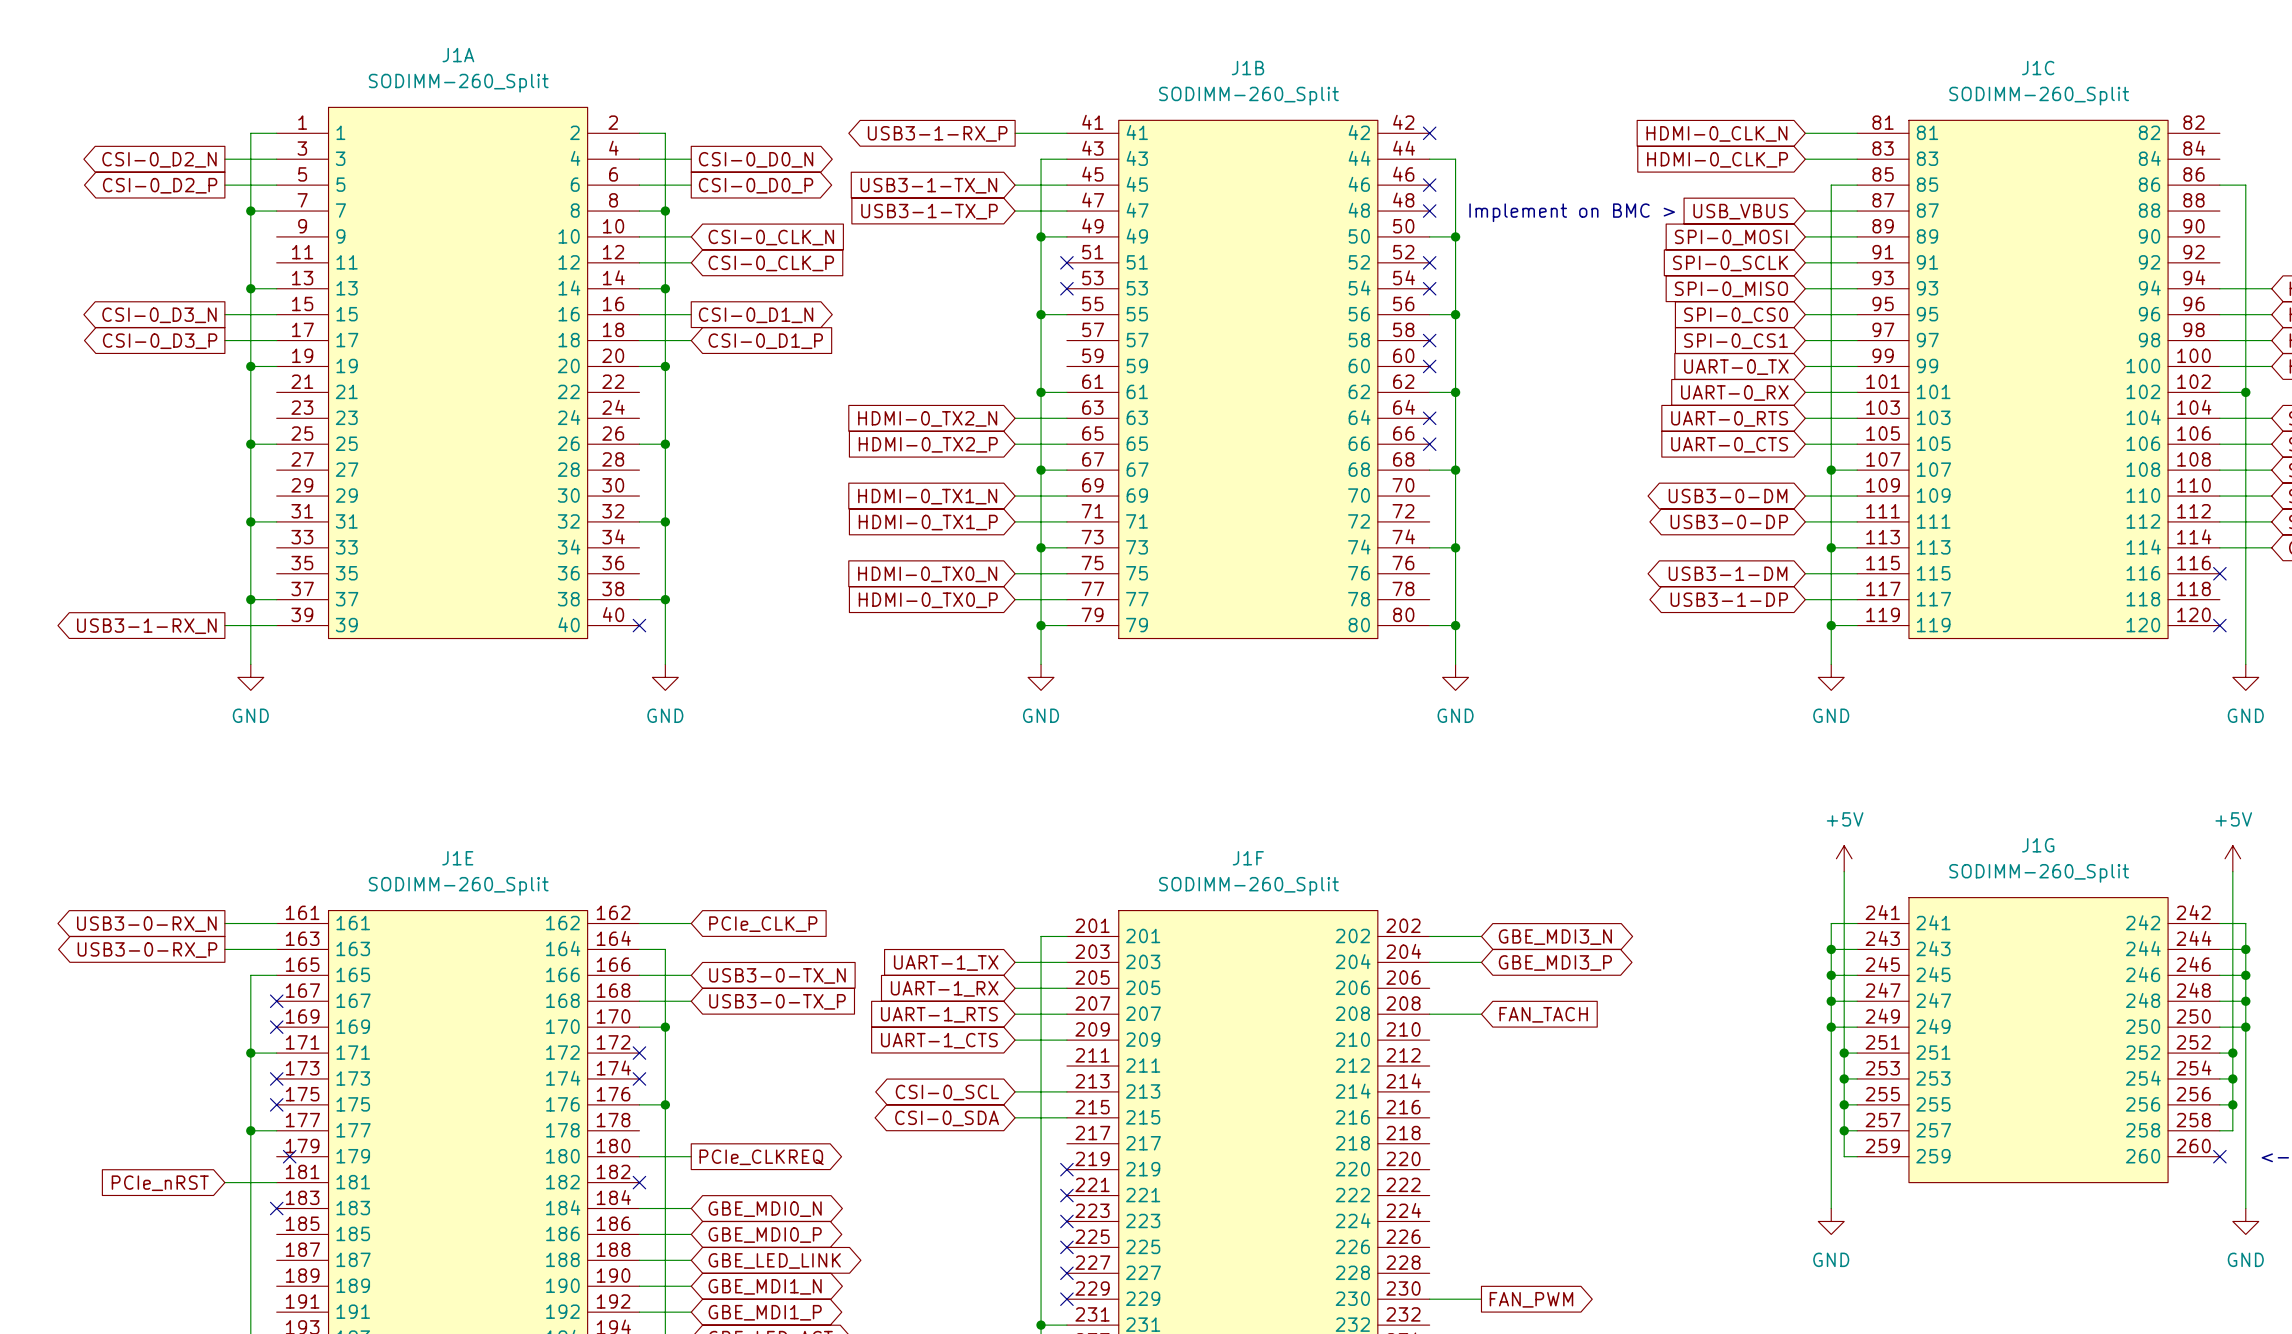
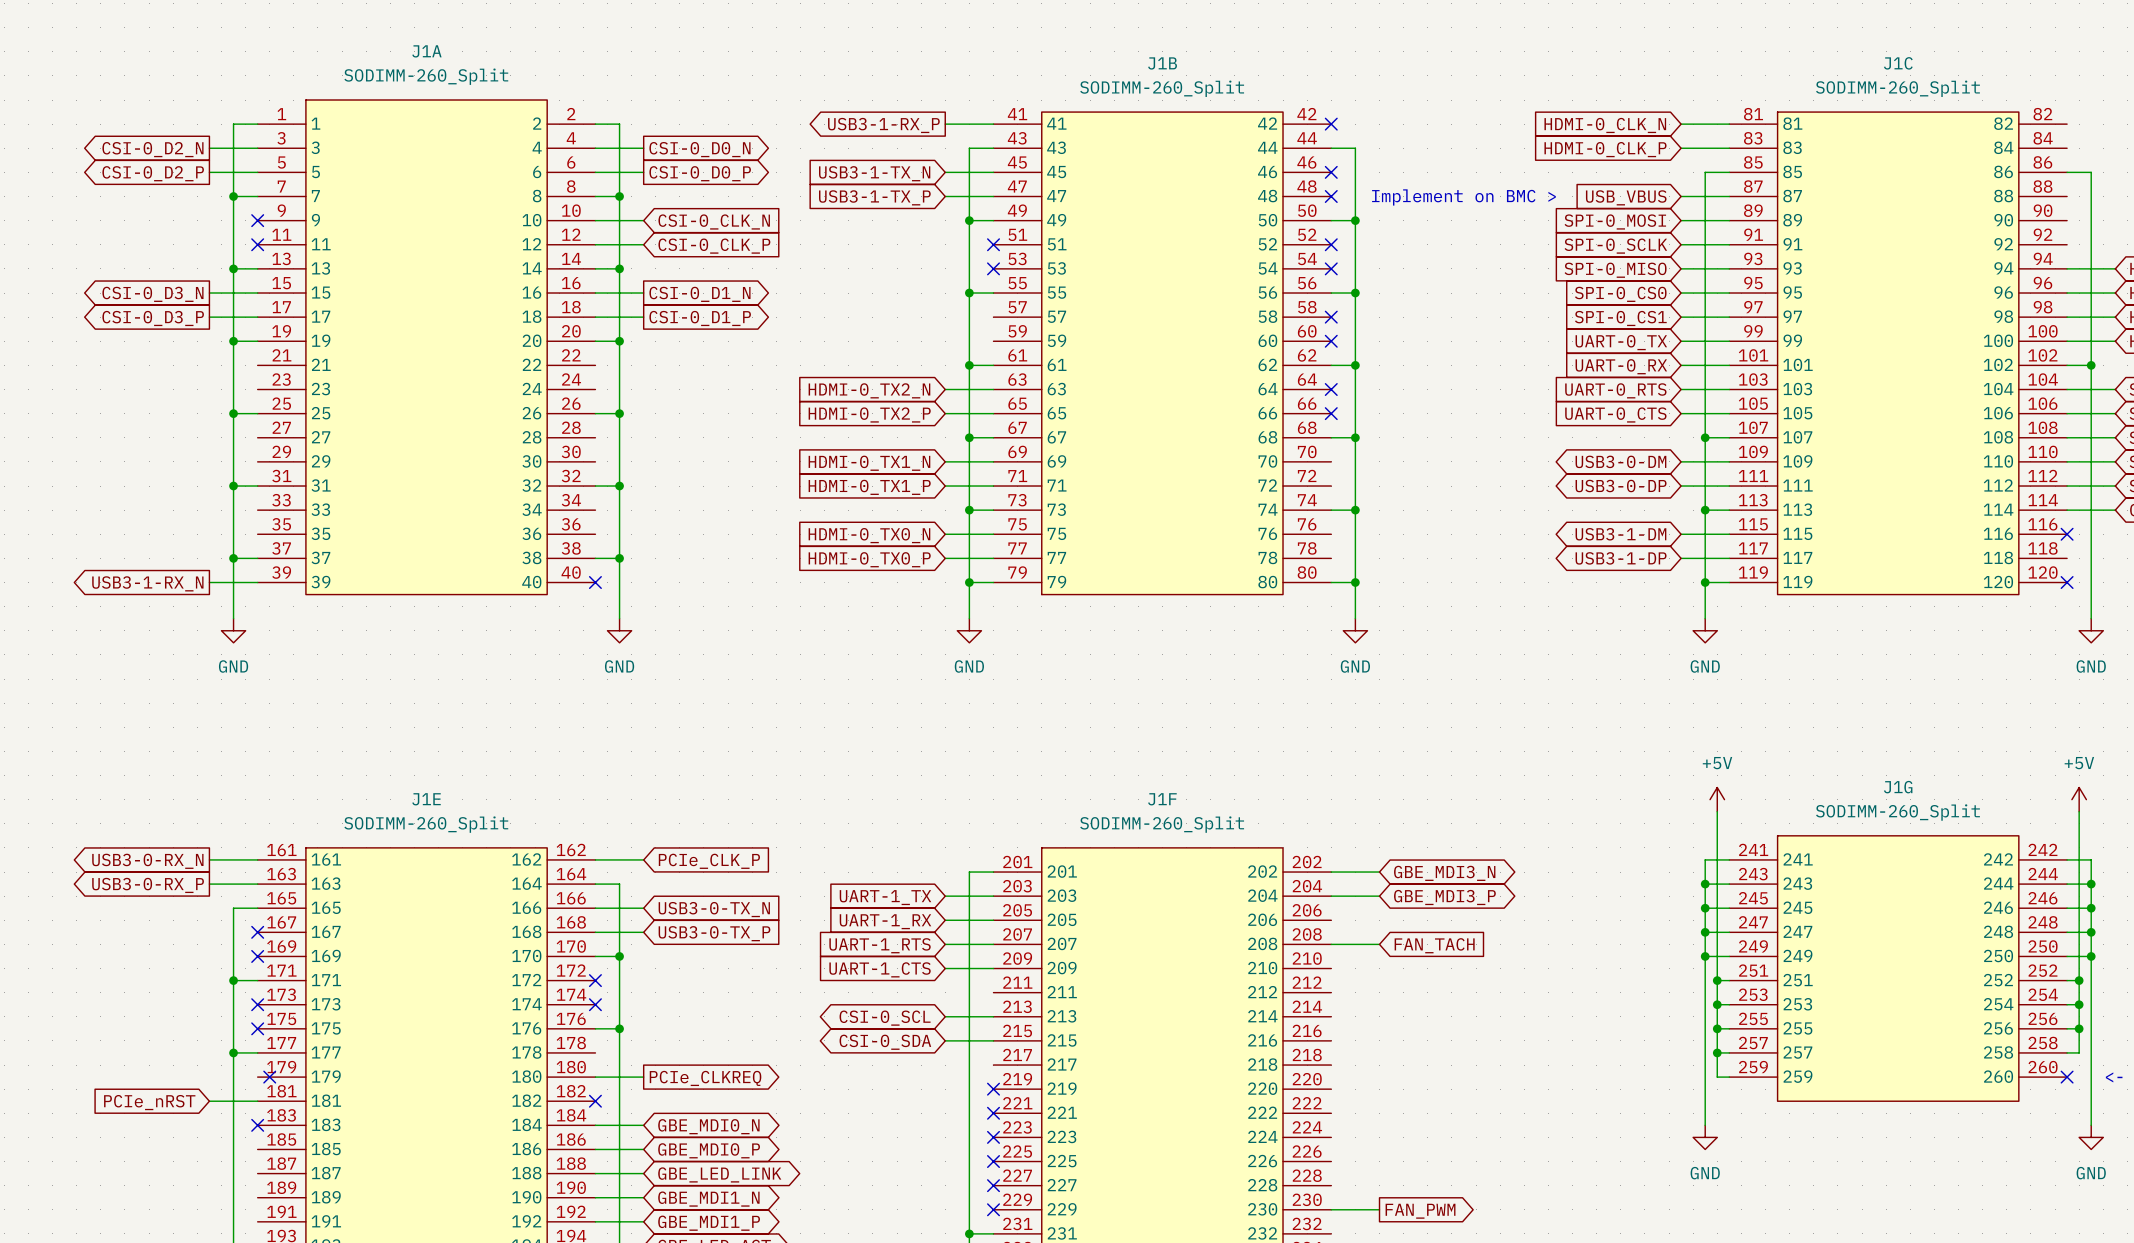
no-connect mark: none -> (257, 220)
no-connect mark: none -> (257, 244)
global label shape: input (765, 341) -> output (700, 318)

